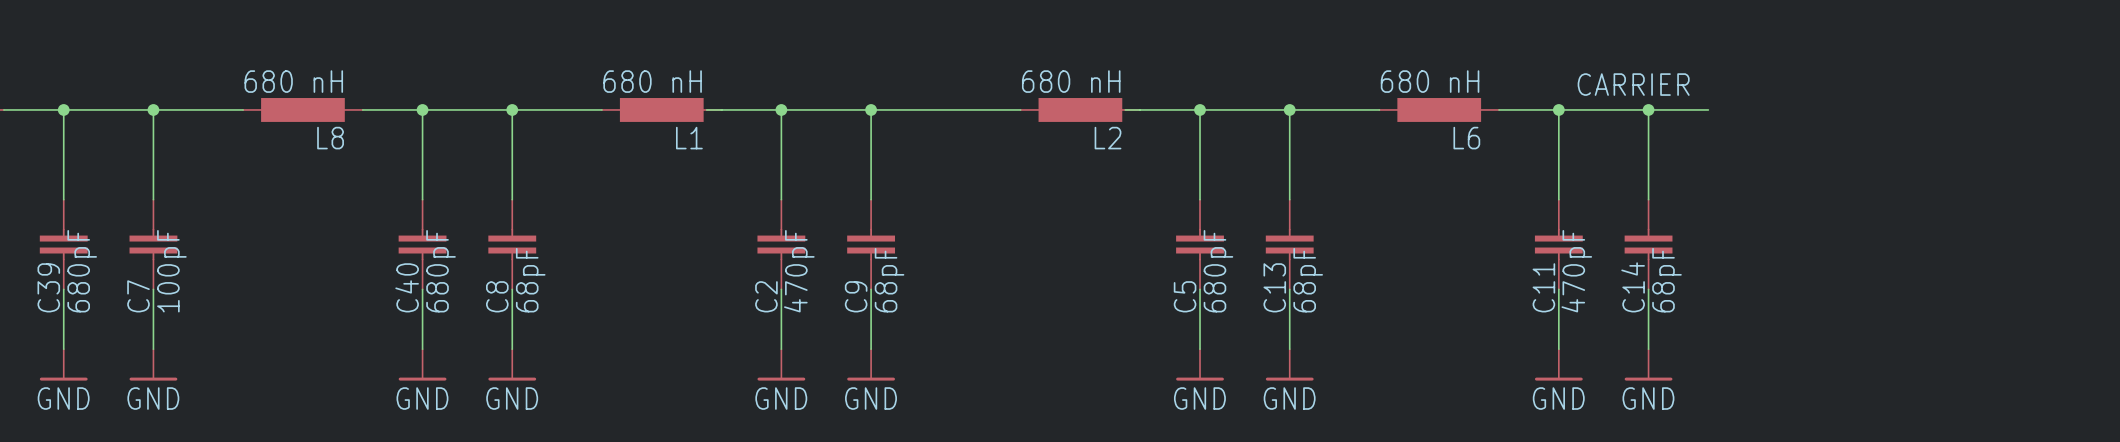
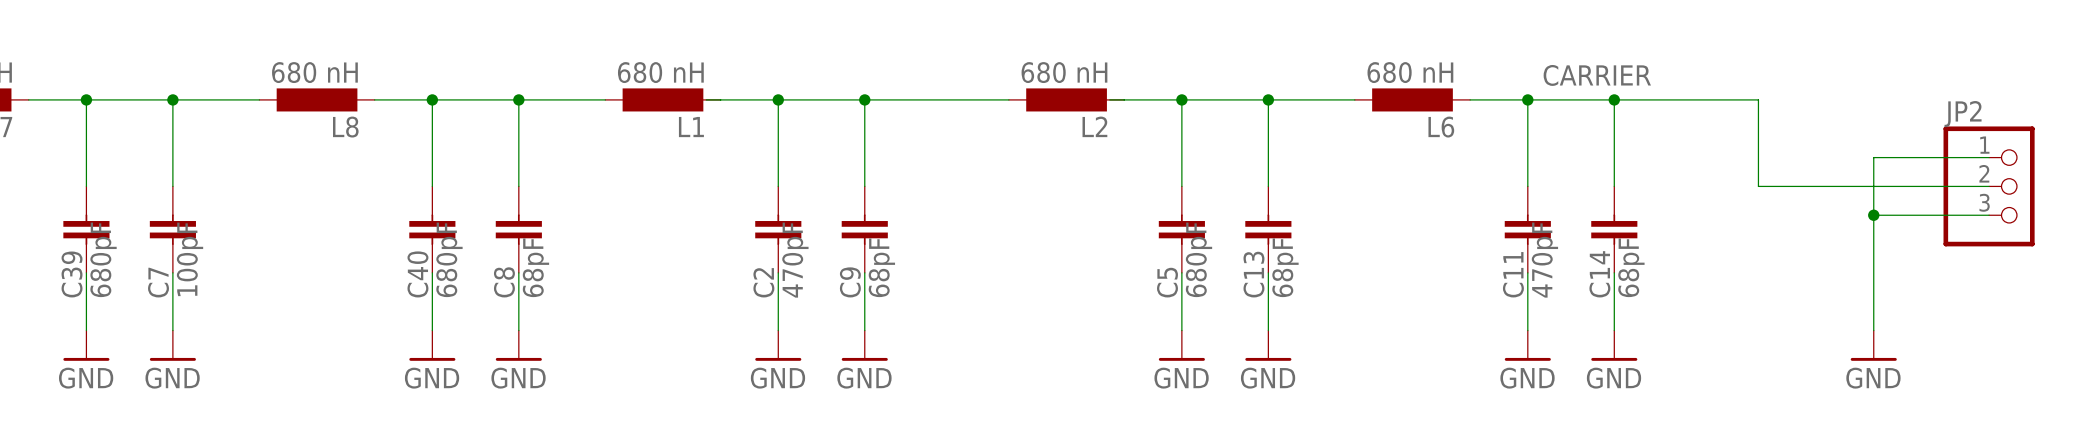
wire: none -> (1671, 99) (1758, 99) (1758, 186) (1989, 186)
wire: none -> (1989, 157) (1873, 157) (1873, 330)
JP2: none -> (1989, 186)
wire: none -> (1873, 215) (1989, 215)
junction: none -> (1873, 215)
power symbol: none -> GND (1873, 345)

